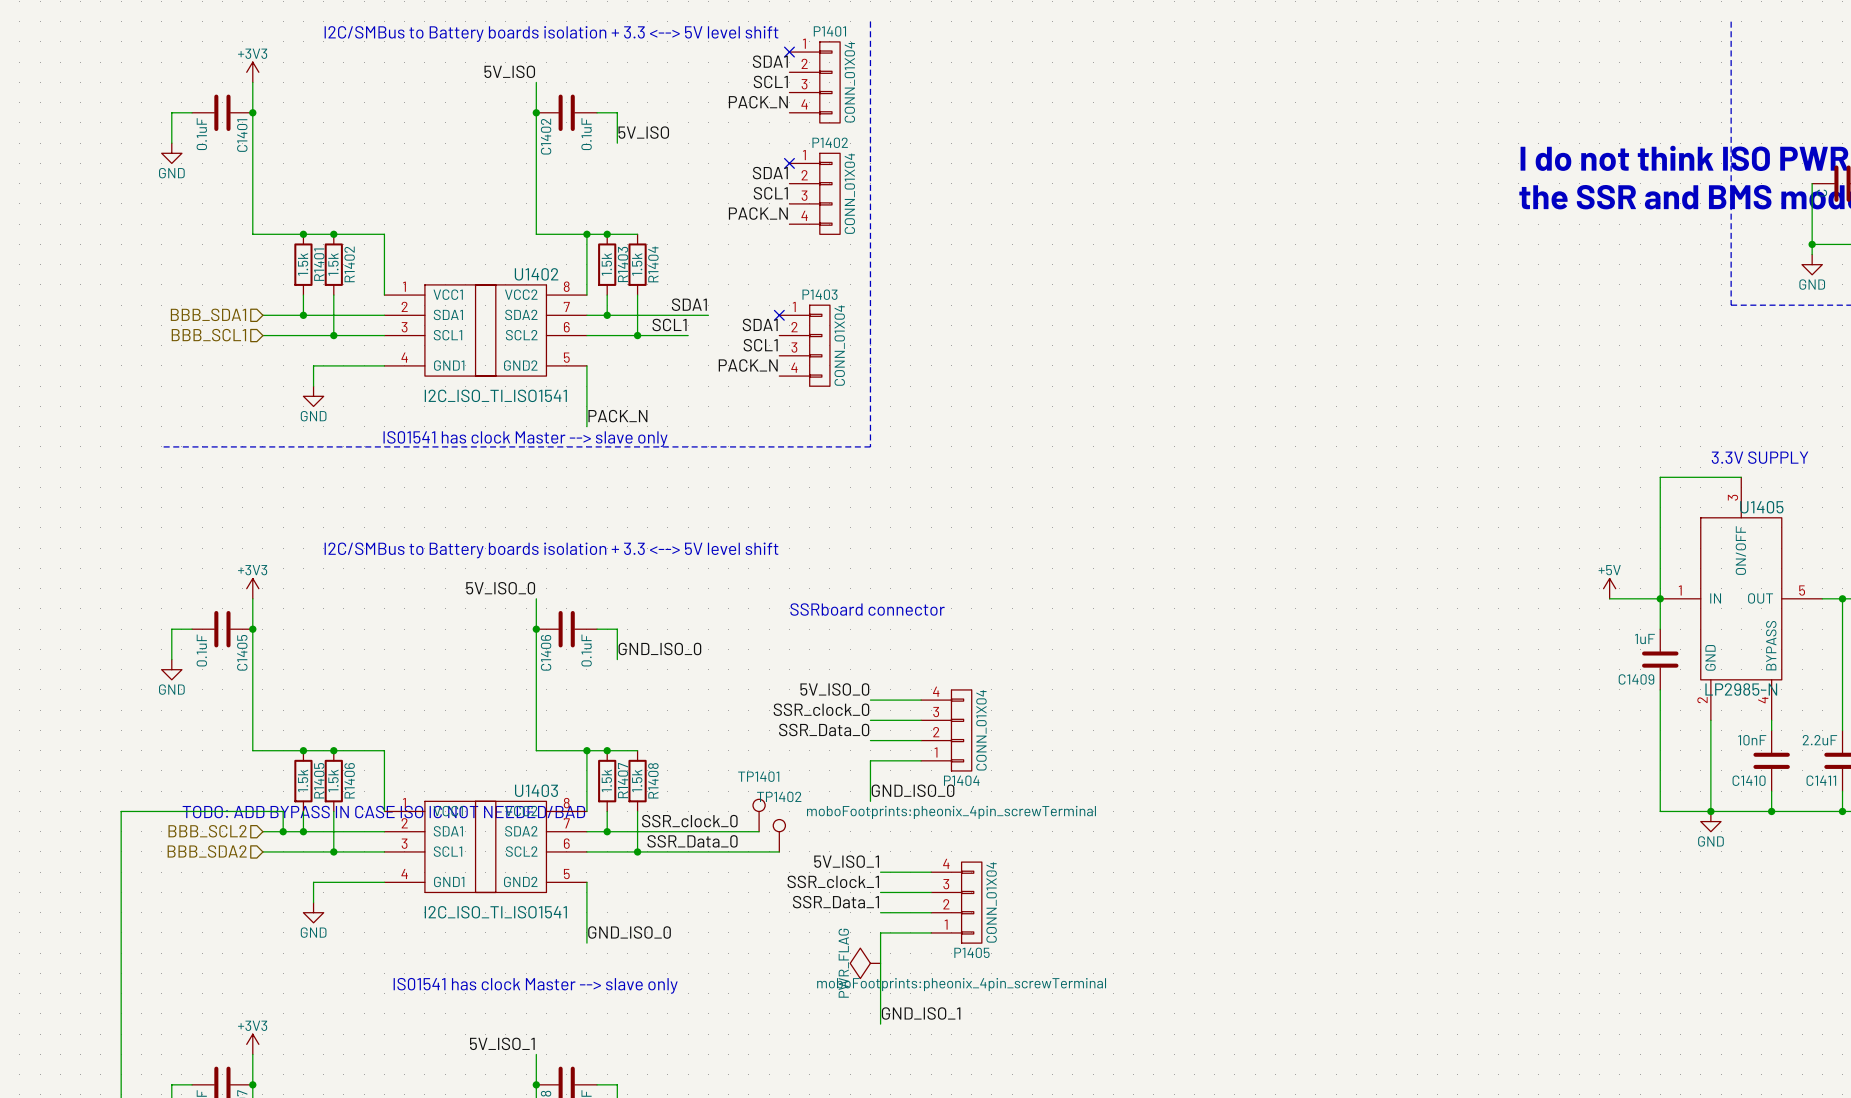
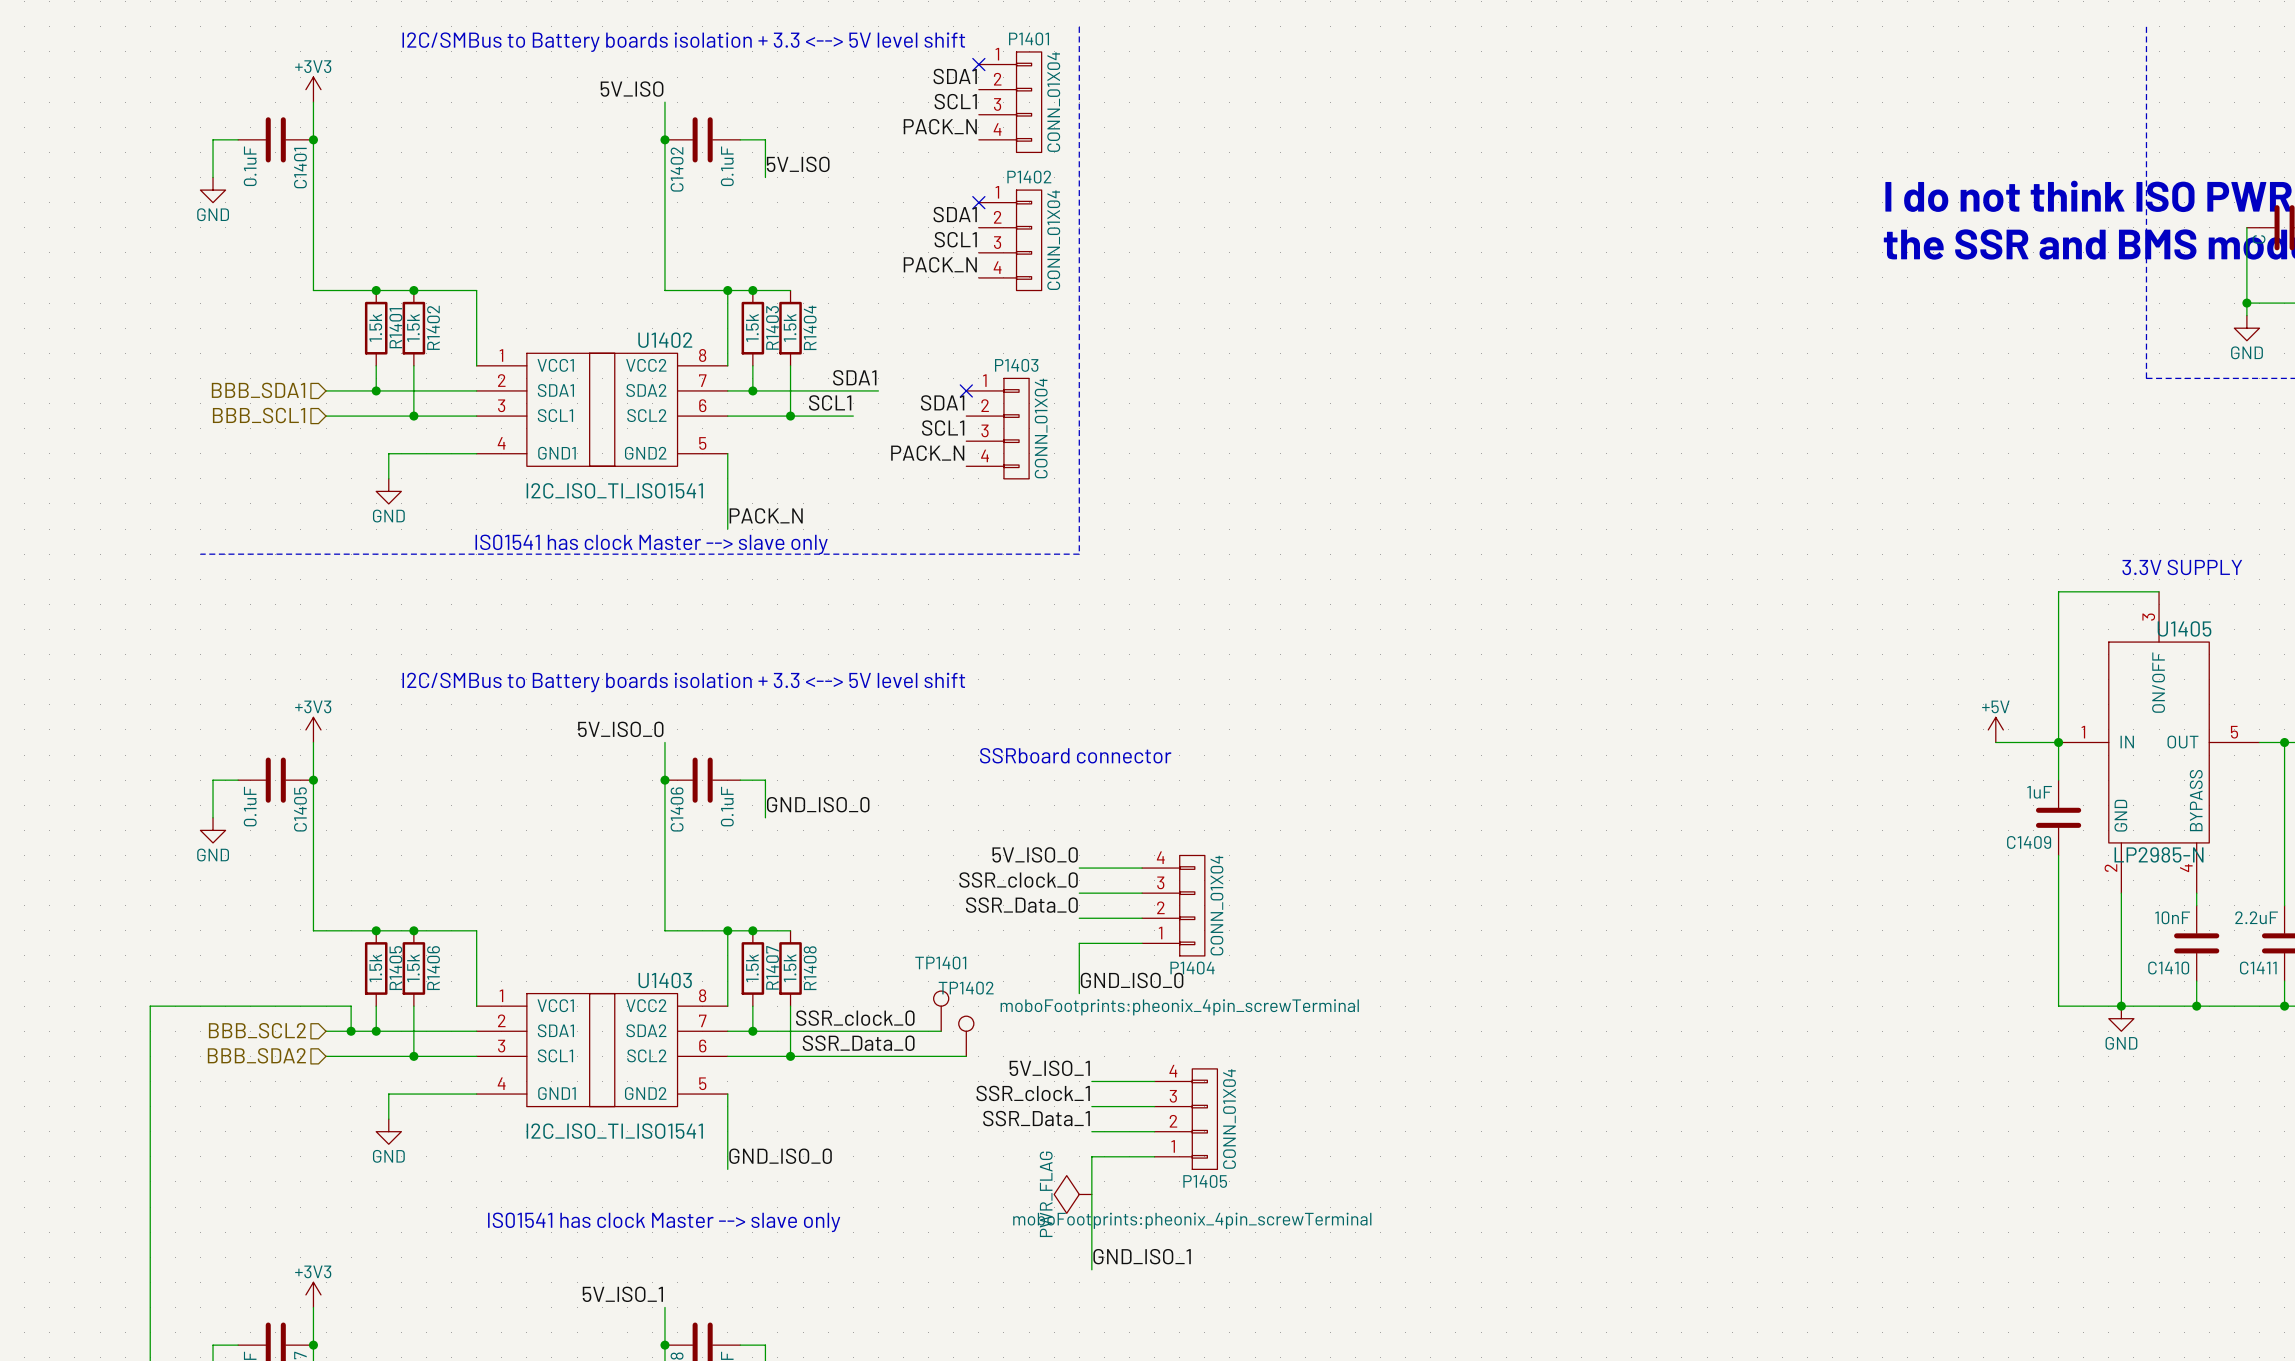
text: TODO: ADD BYPASS IN CASE ISO IC NOT NEEDED/BAD (383, 812) -> none

